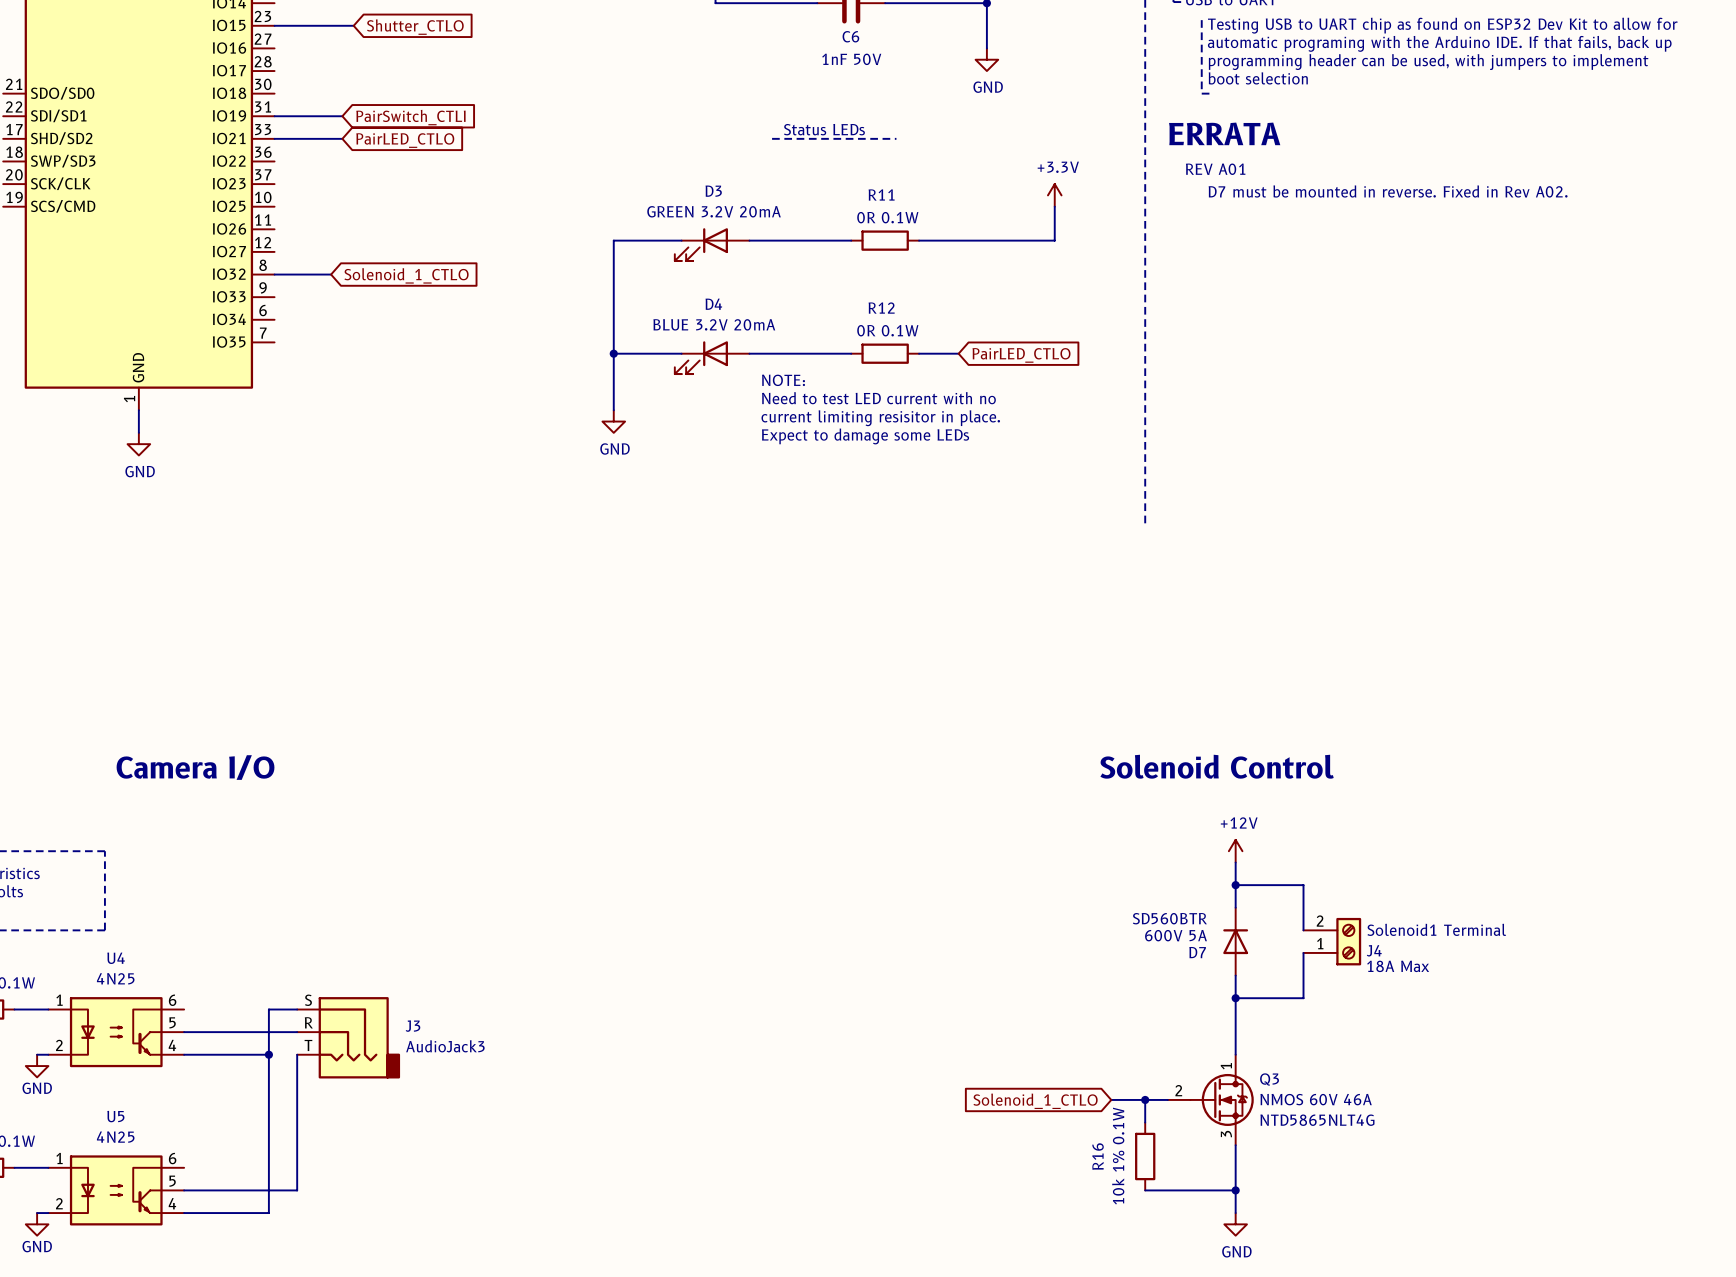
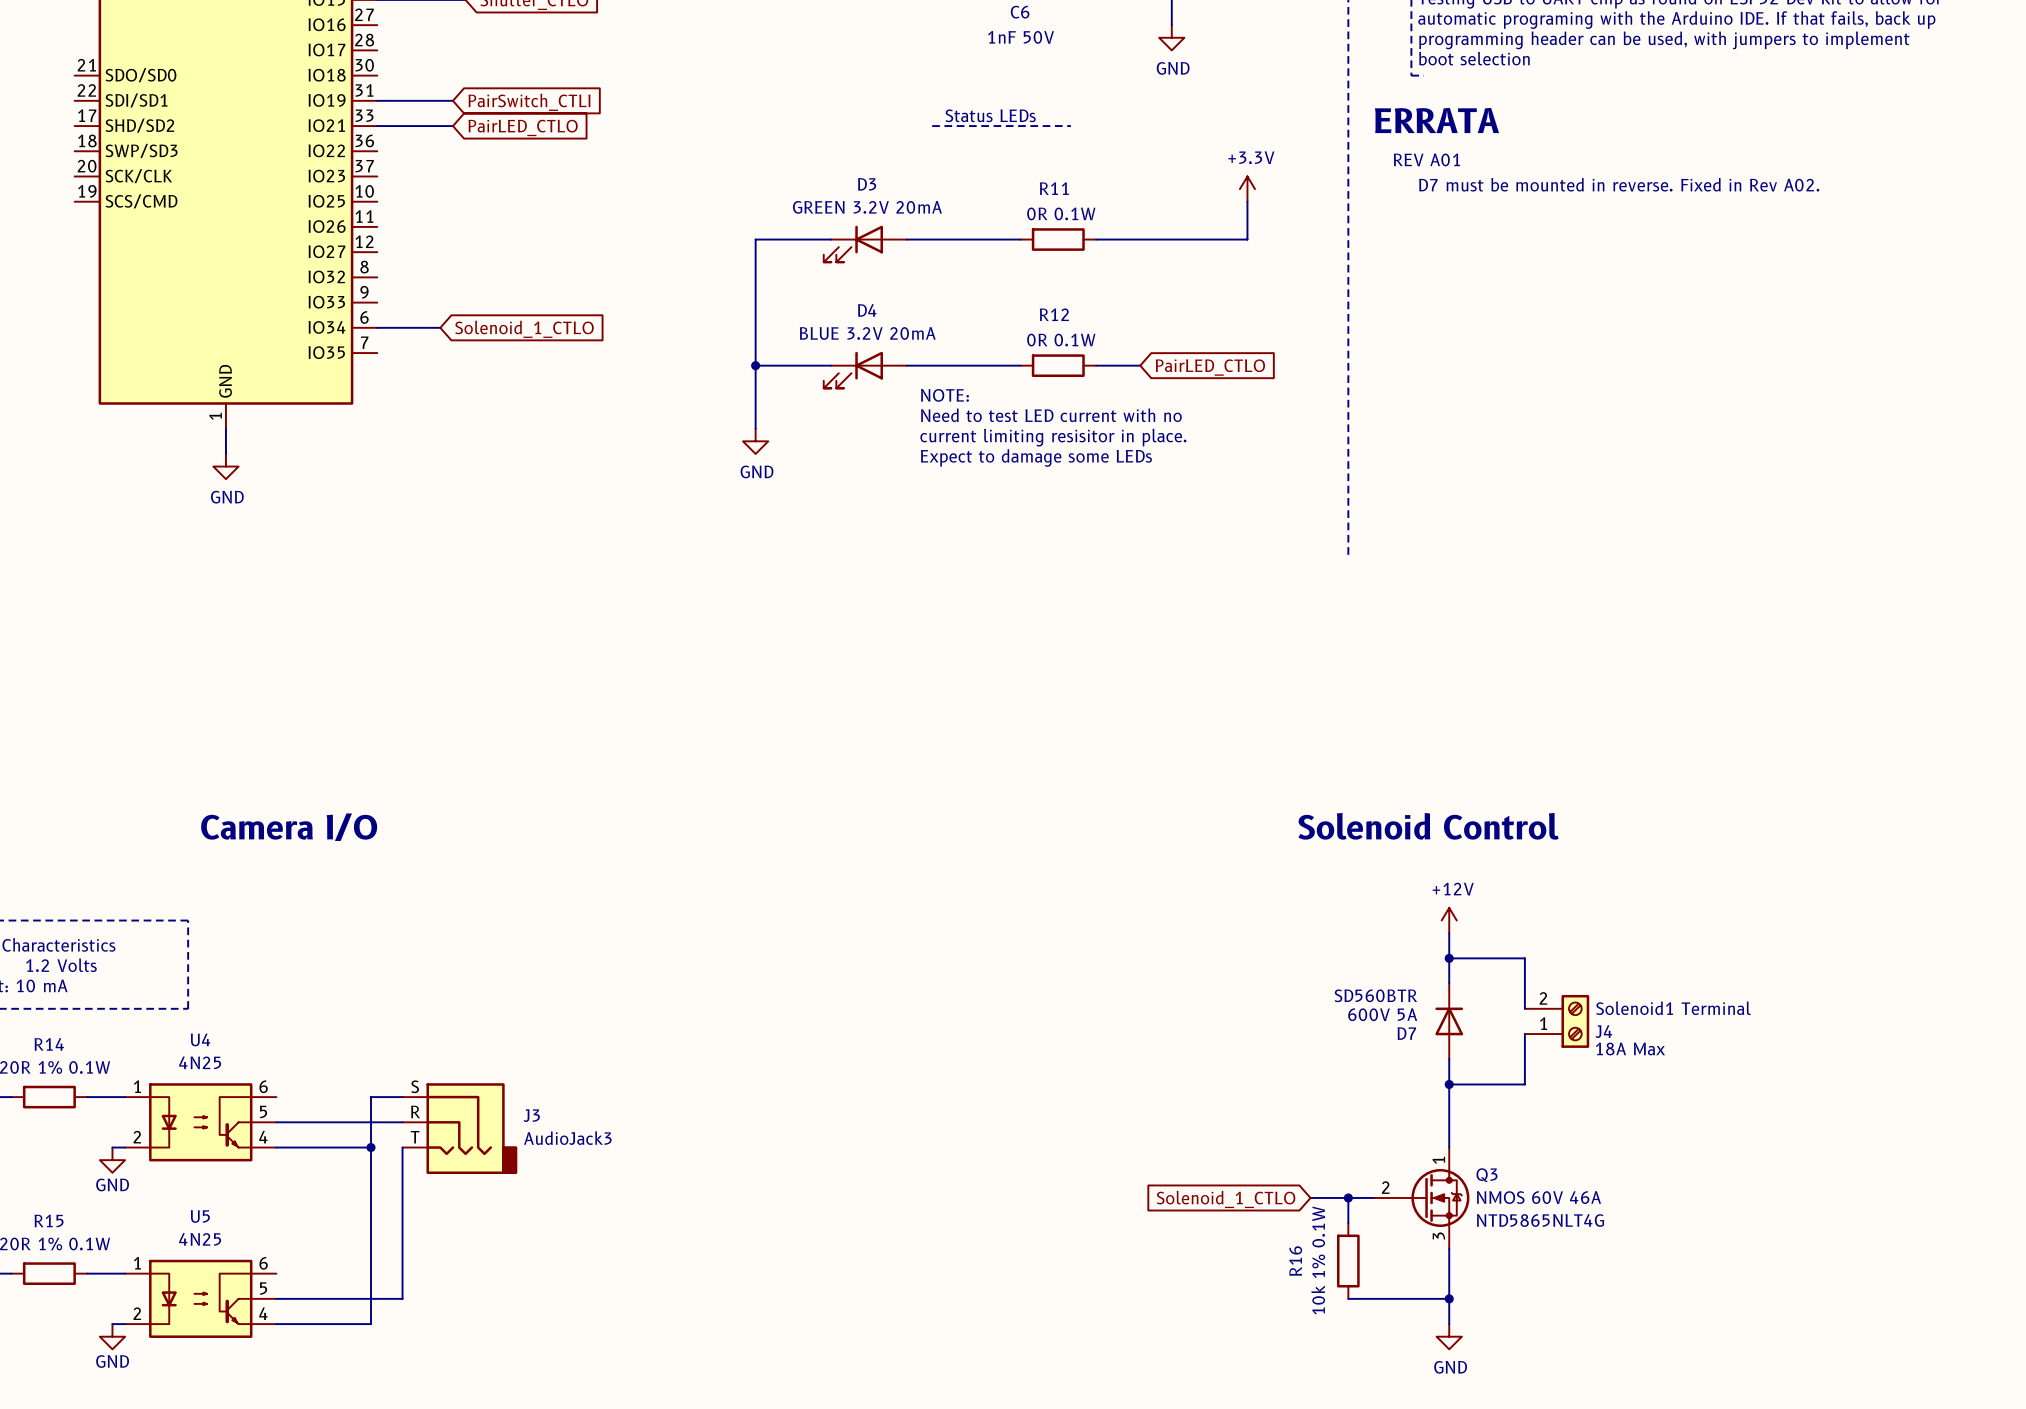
wire: (274, 274) (331, 274) -> (377, 327) (440, 327)
global label position: Solenoid_1_CTLO (406, 275) -> Solenoid_1_CTLO (524, 329)

